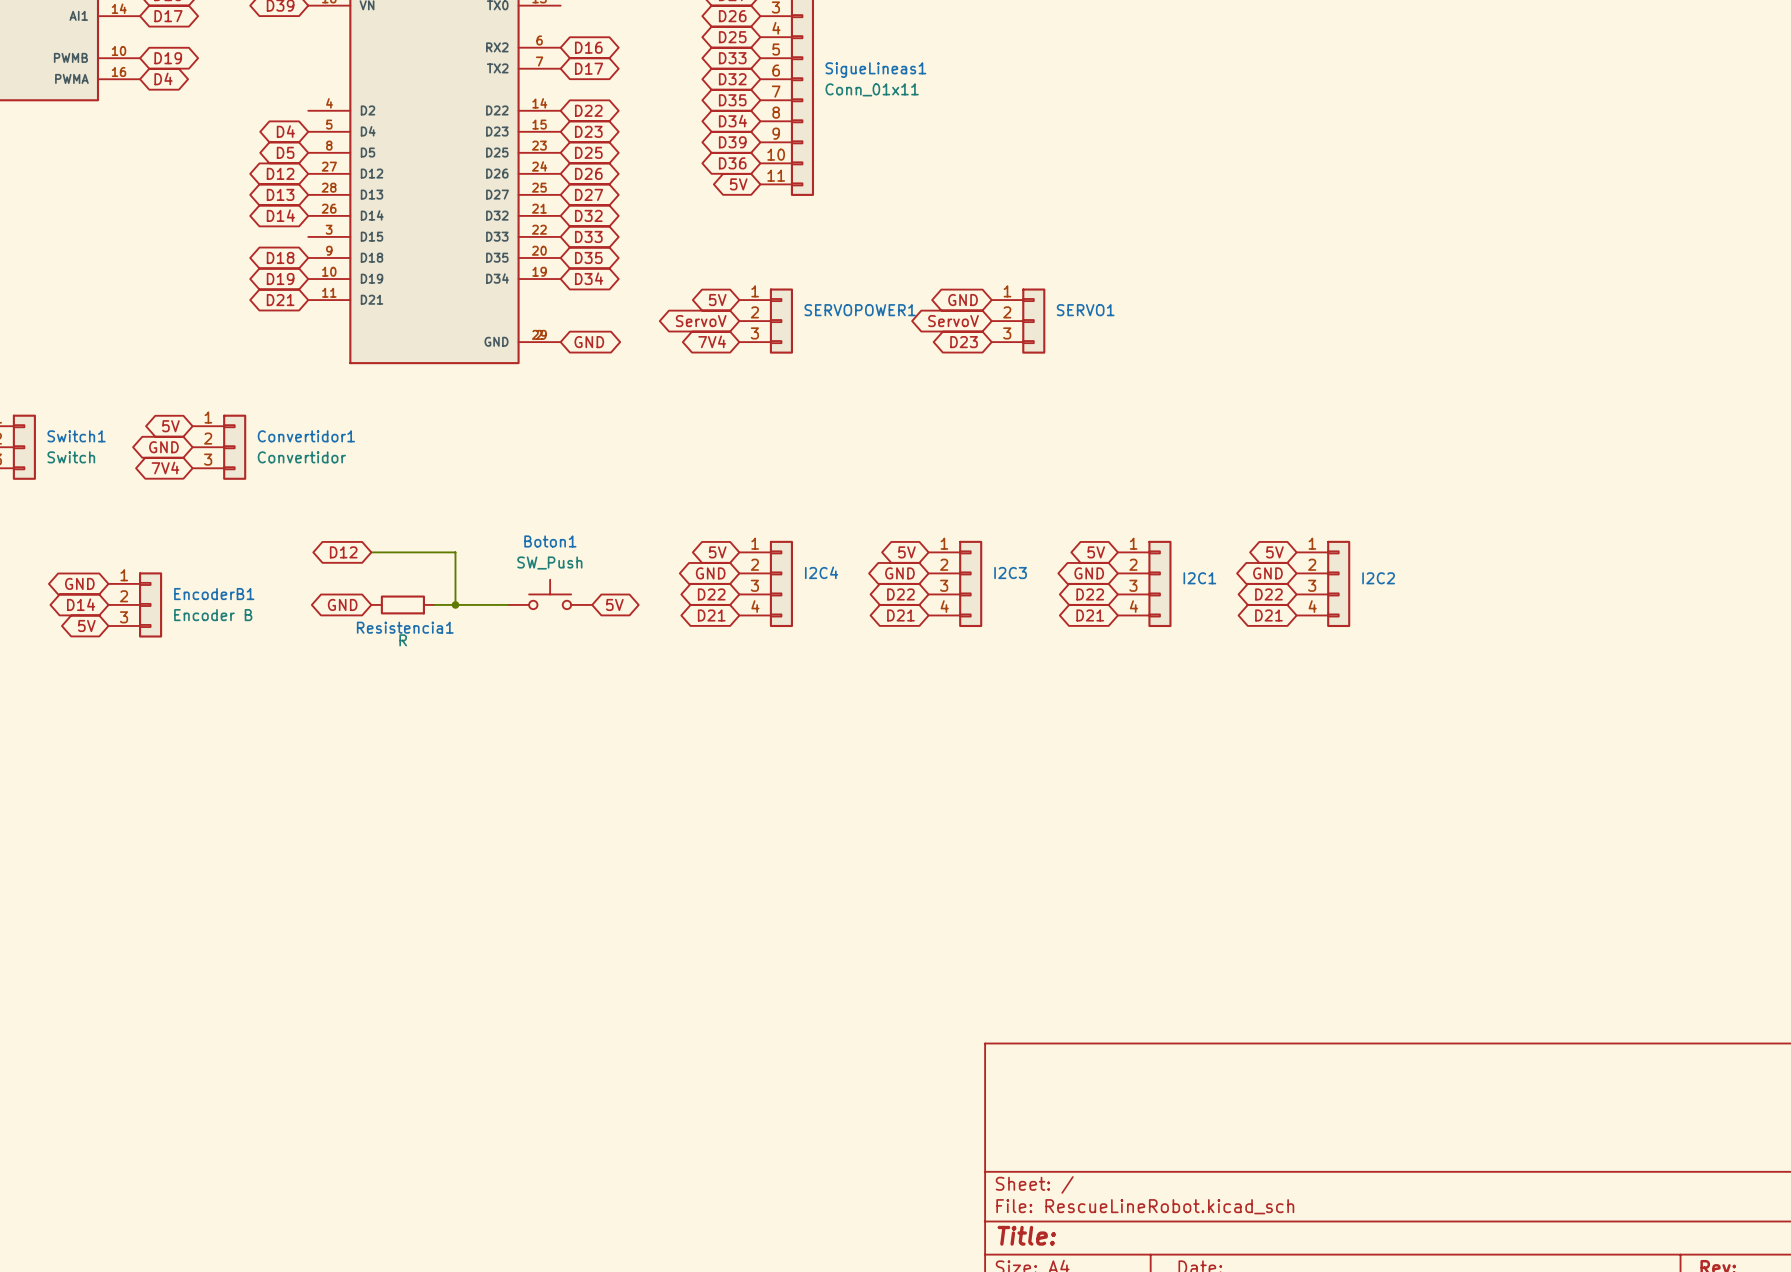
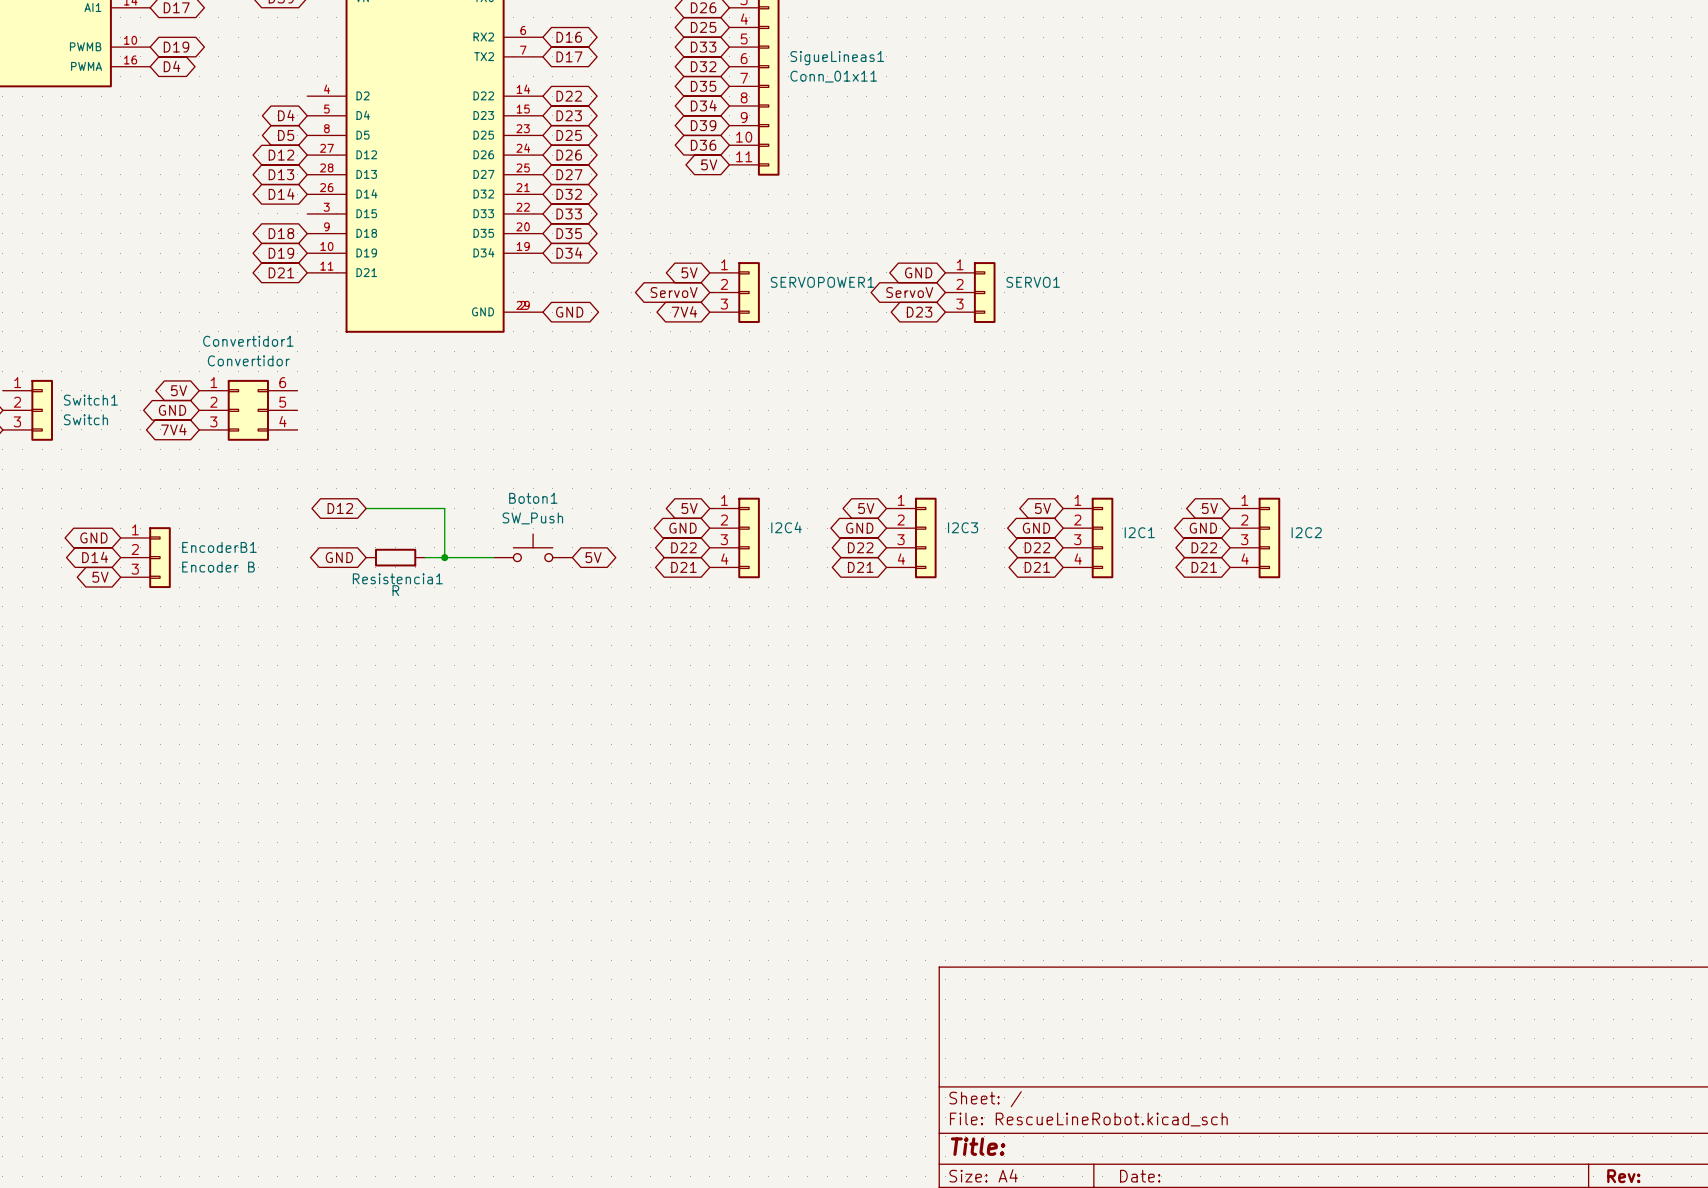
Convertidor1 symbol: [192, 414, 247, 480] -> [199, 379, 298, 441]
Convertidor1 name position: Convertidor1 (306, 436) -> Convertidor1 (248, 341)
Convertidor1 value position: Convertidor (301, 457) -> Convertidor (248, 360)

